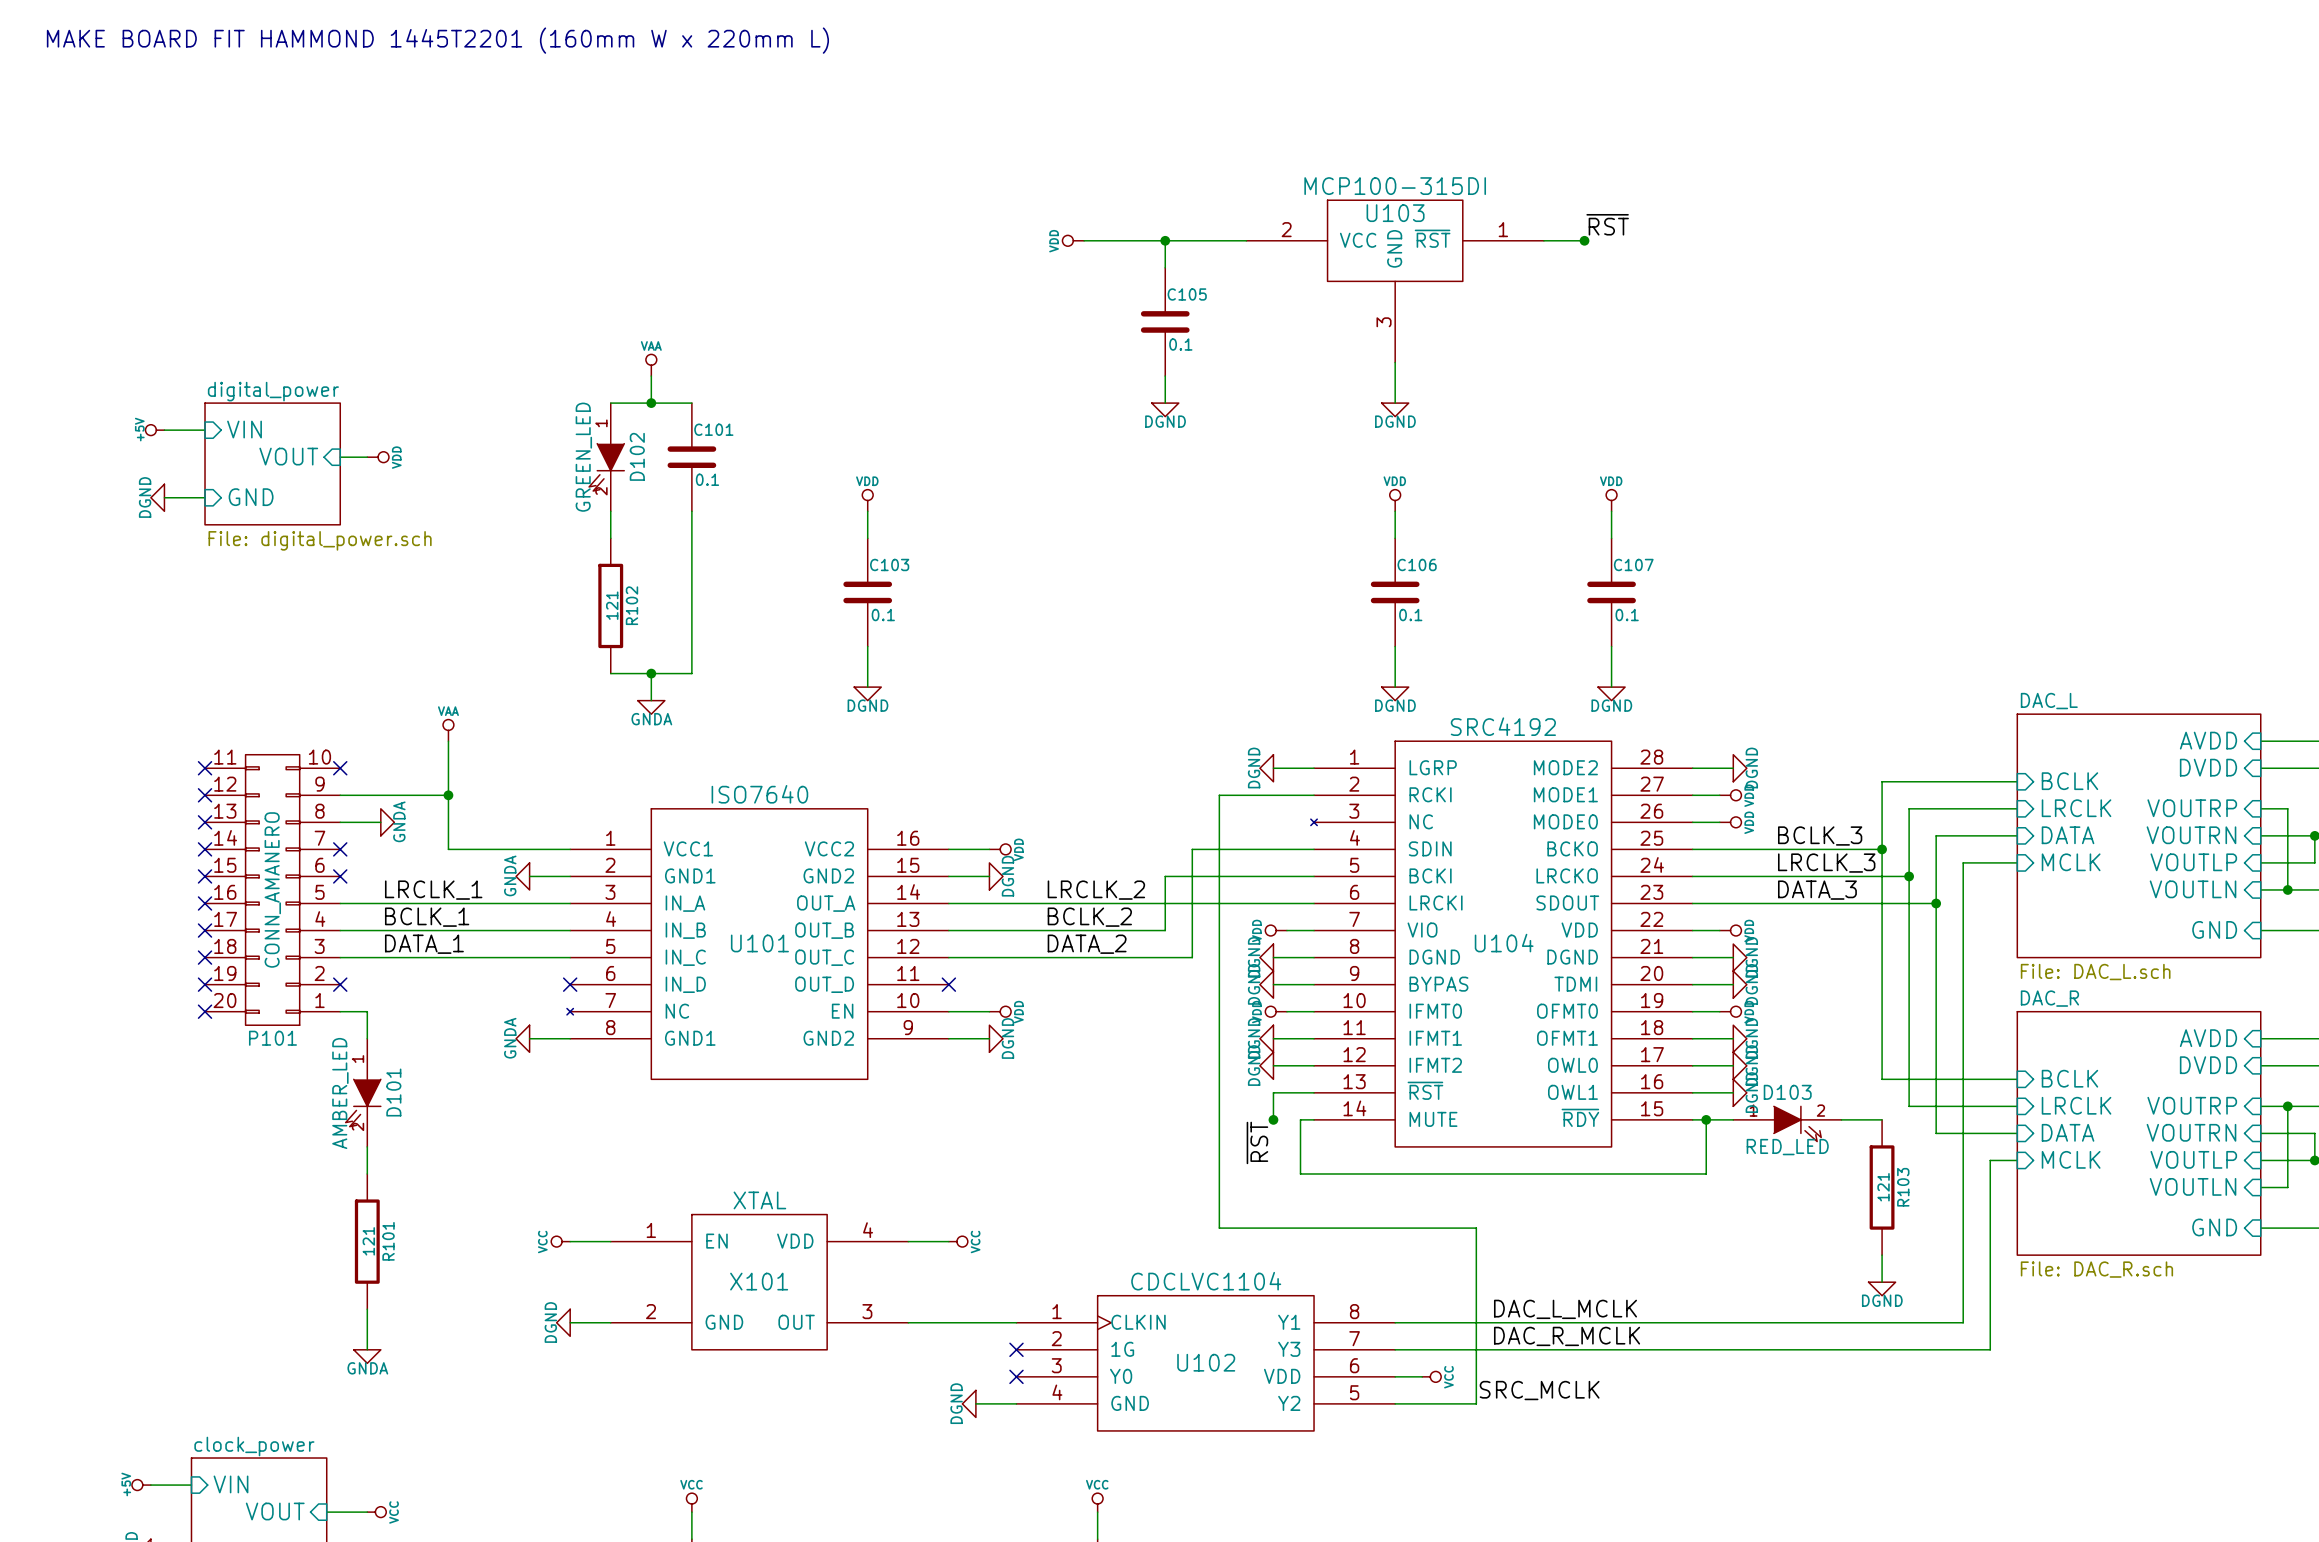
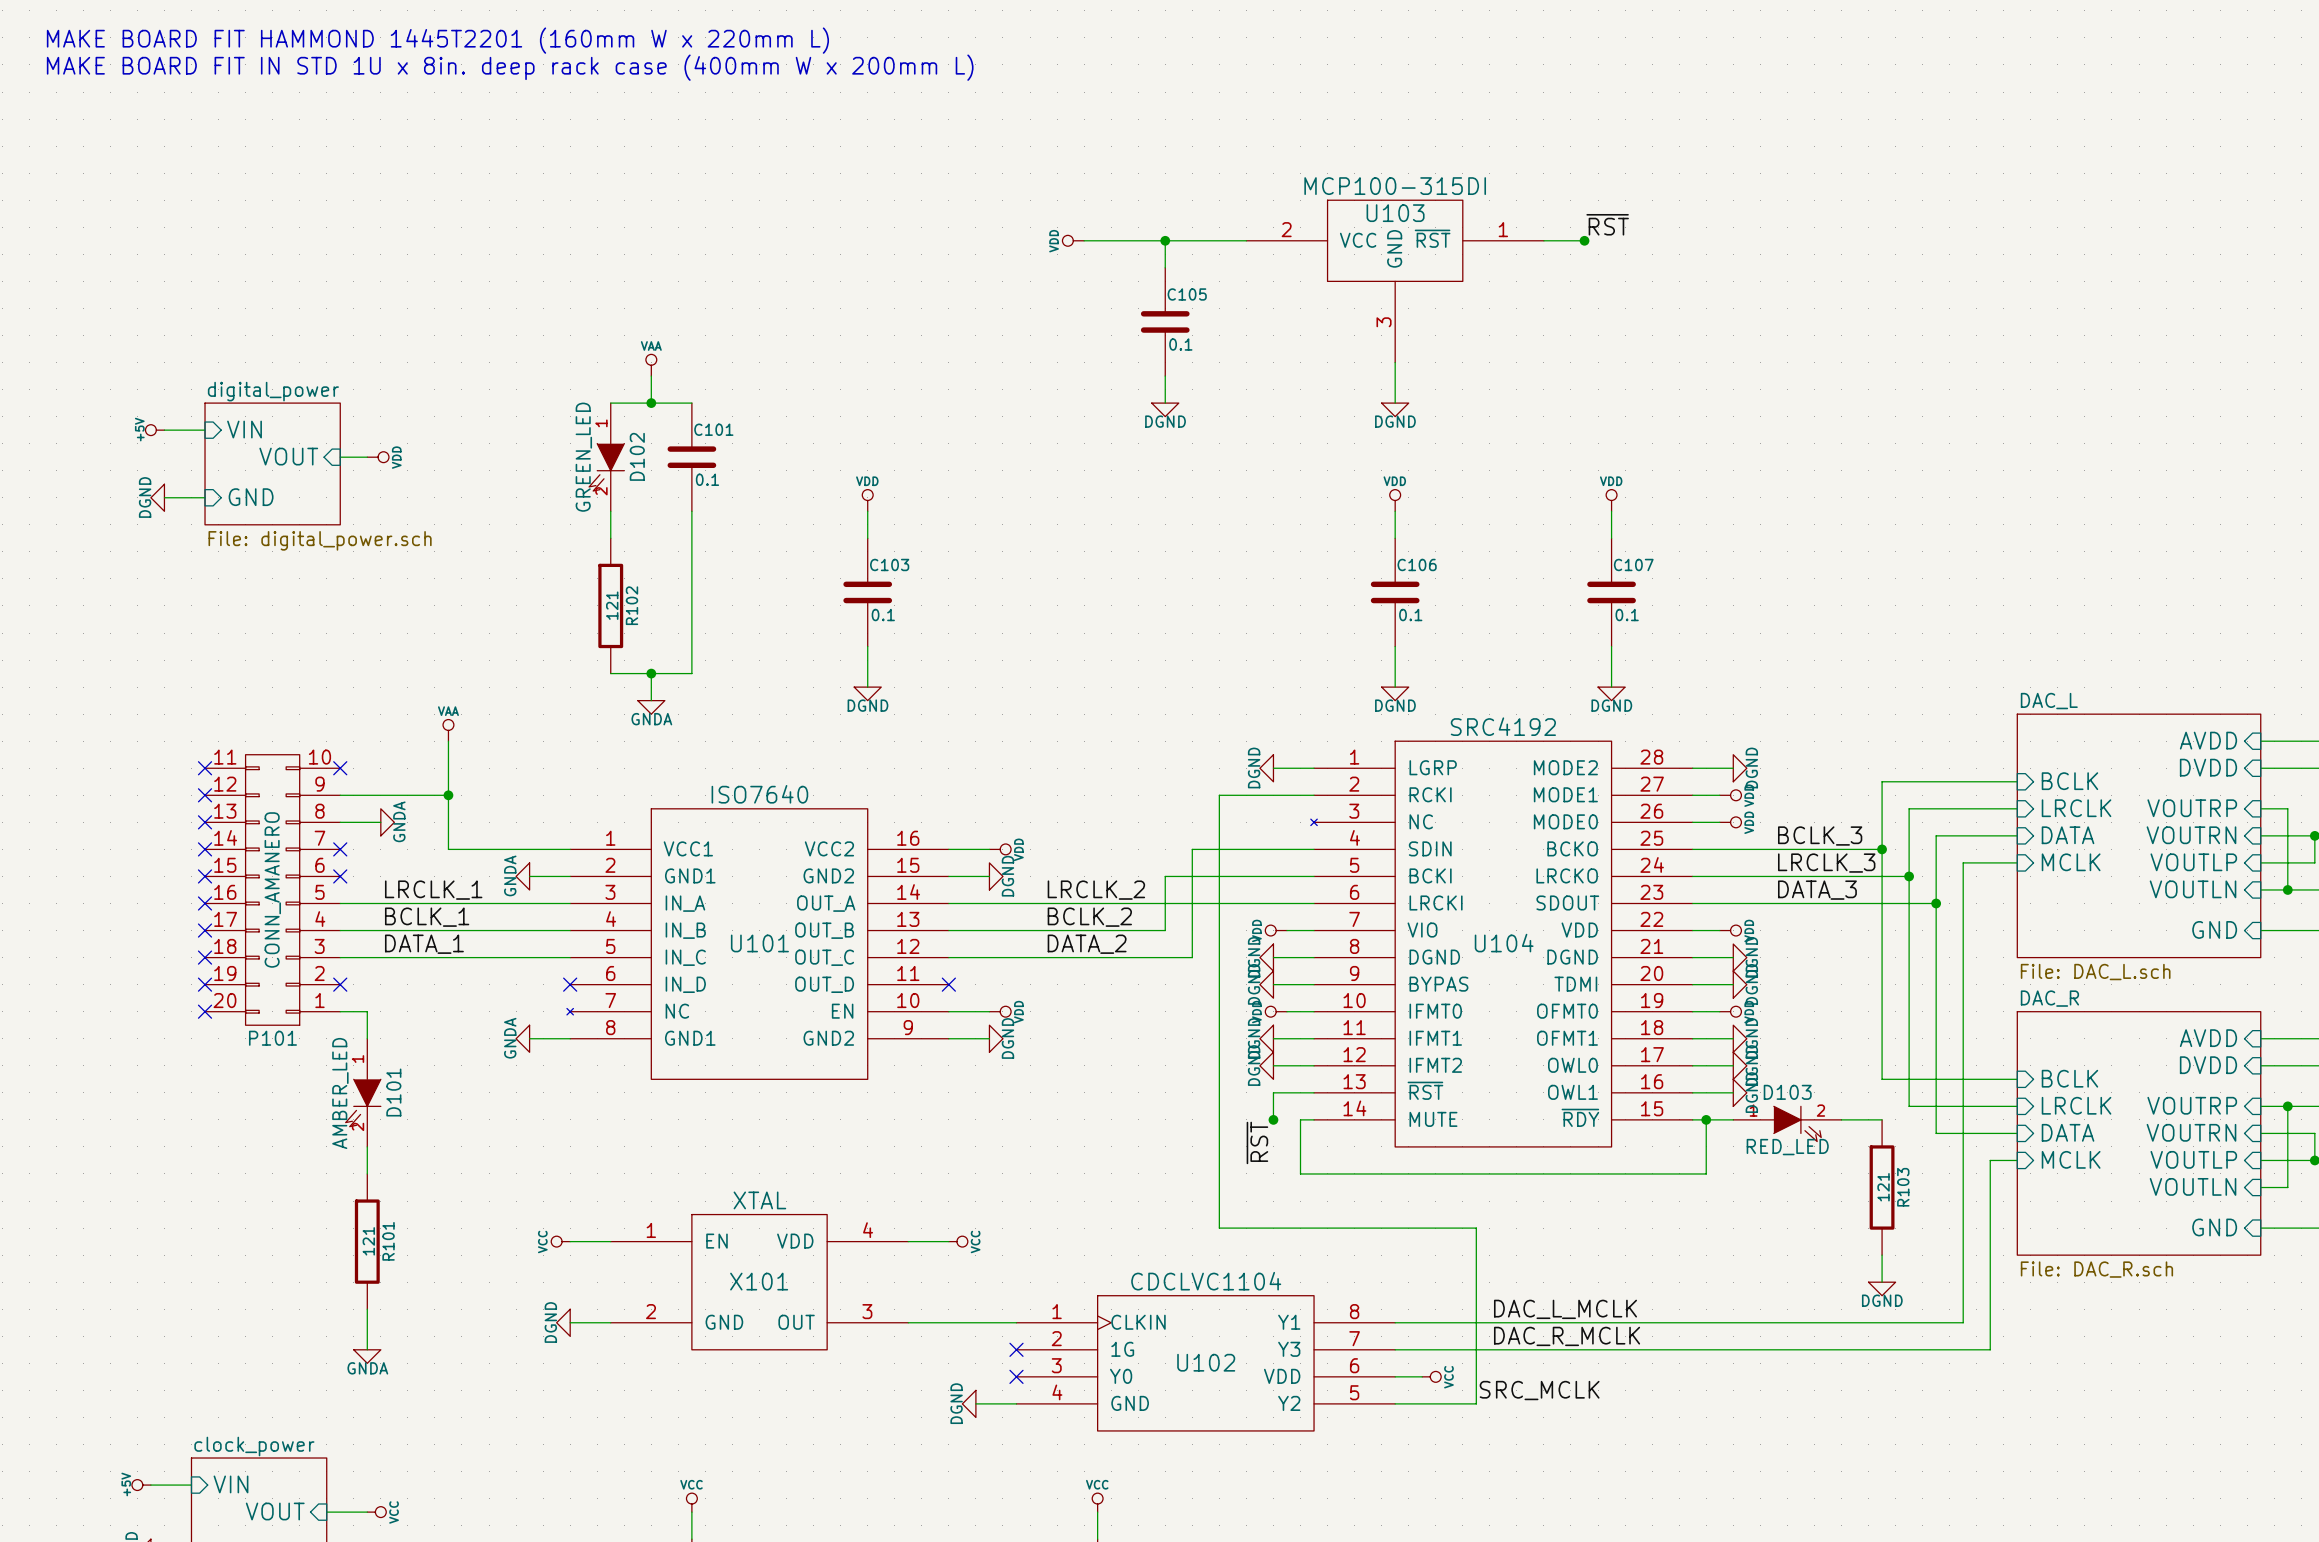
text: none -> MAKE BOARD FIT IN STD 1U x 8in. deep rack case (400mm W x 200mm L) (510, 67)

